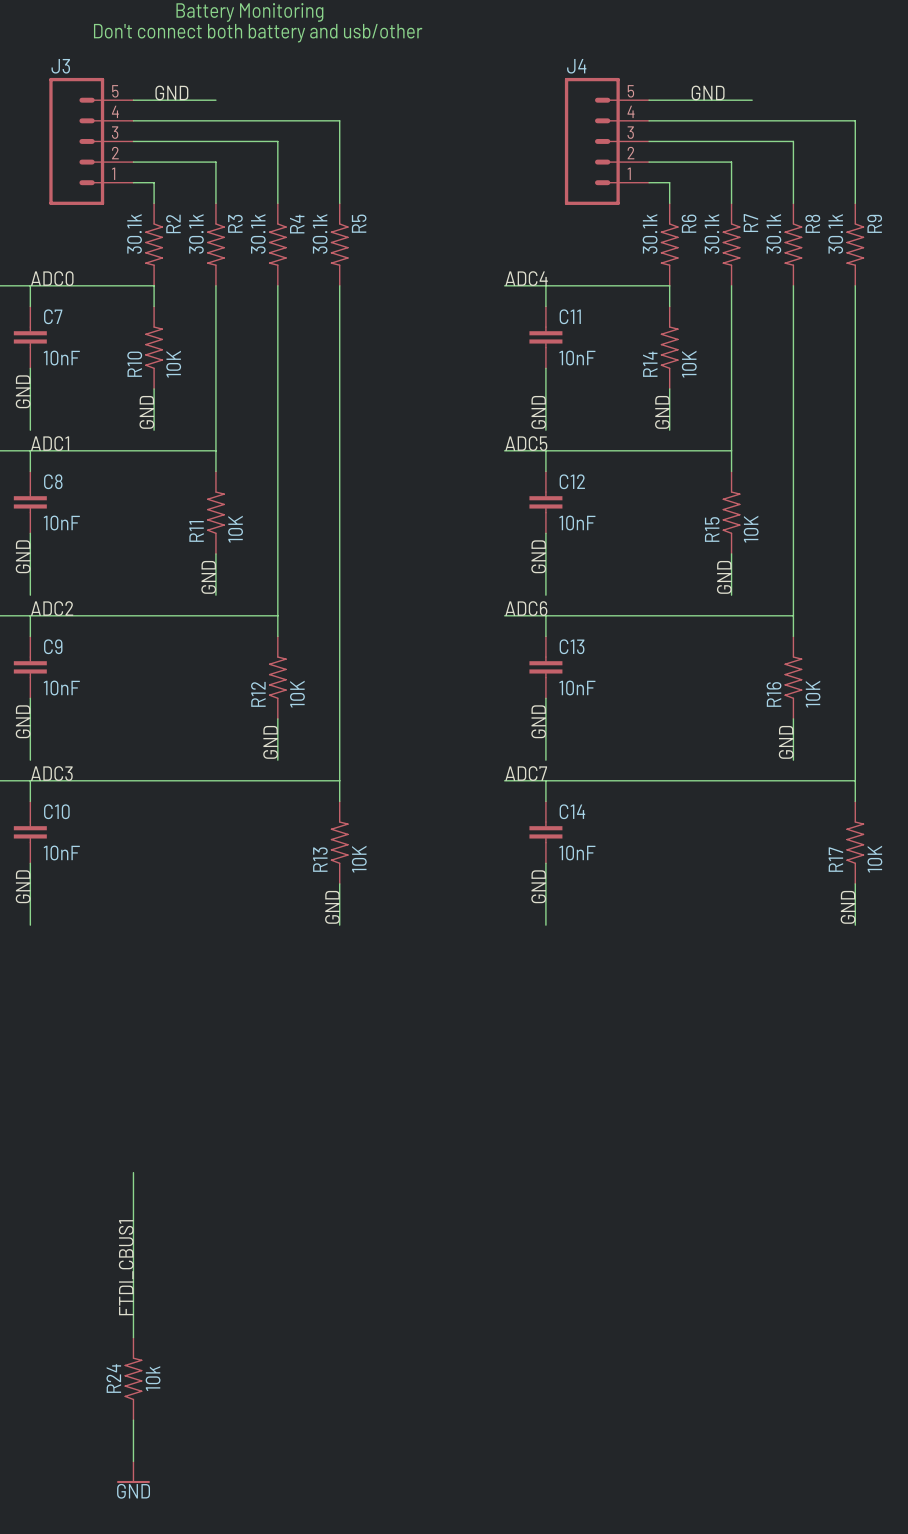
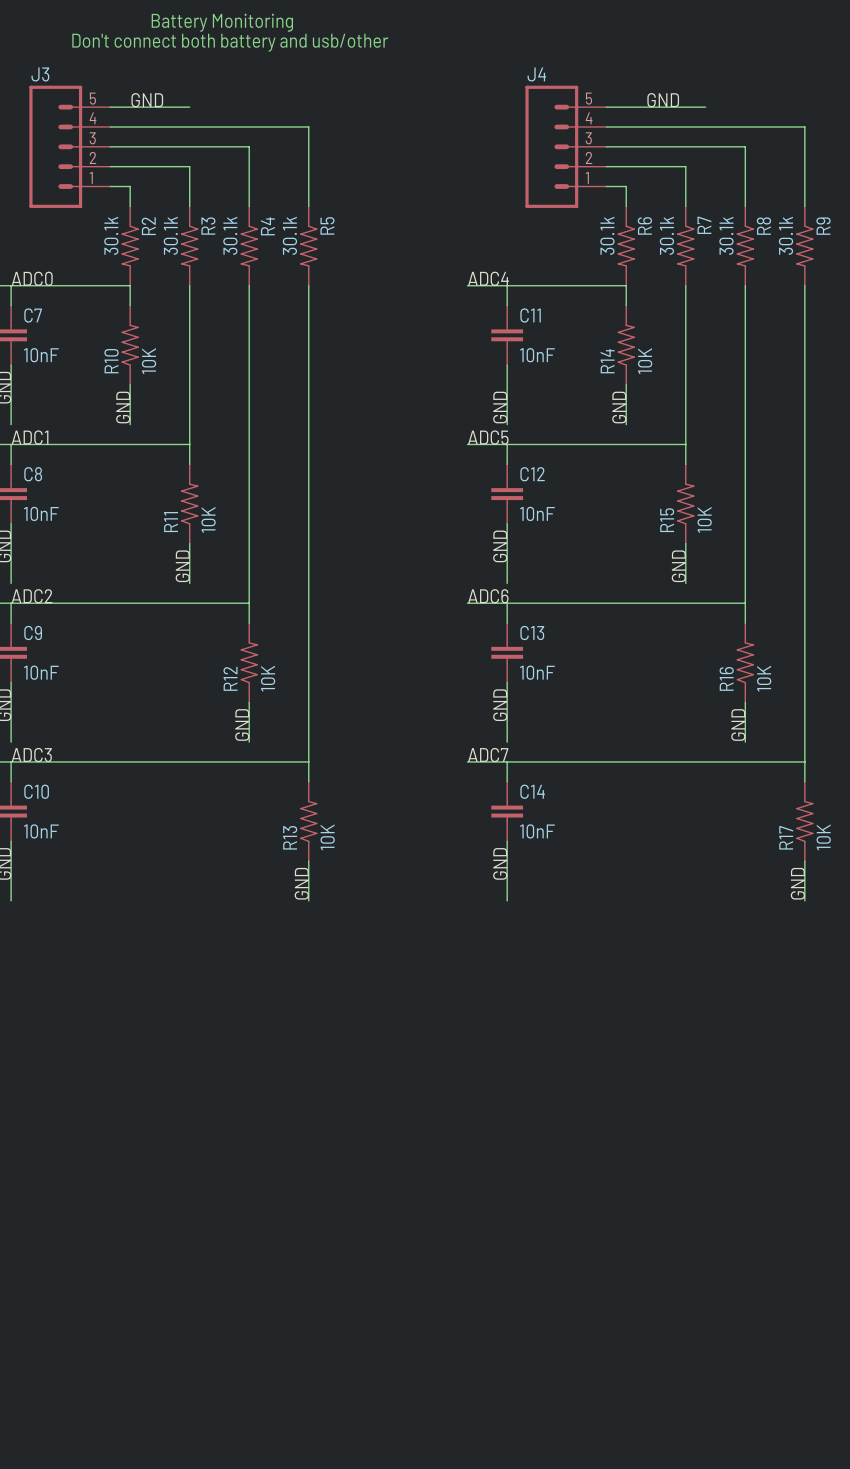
wire: (133, 1172) (133, 1337) -> none
label: FTDI_CBUS1 (126, 1267) -> none
R24: 10k (133, 1378) -> none
wire: (133, 1420) (133, 1461) -> none
power symbol: GND (133, 1472) -> none

